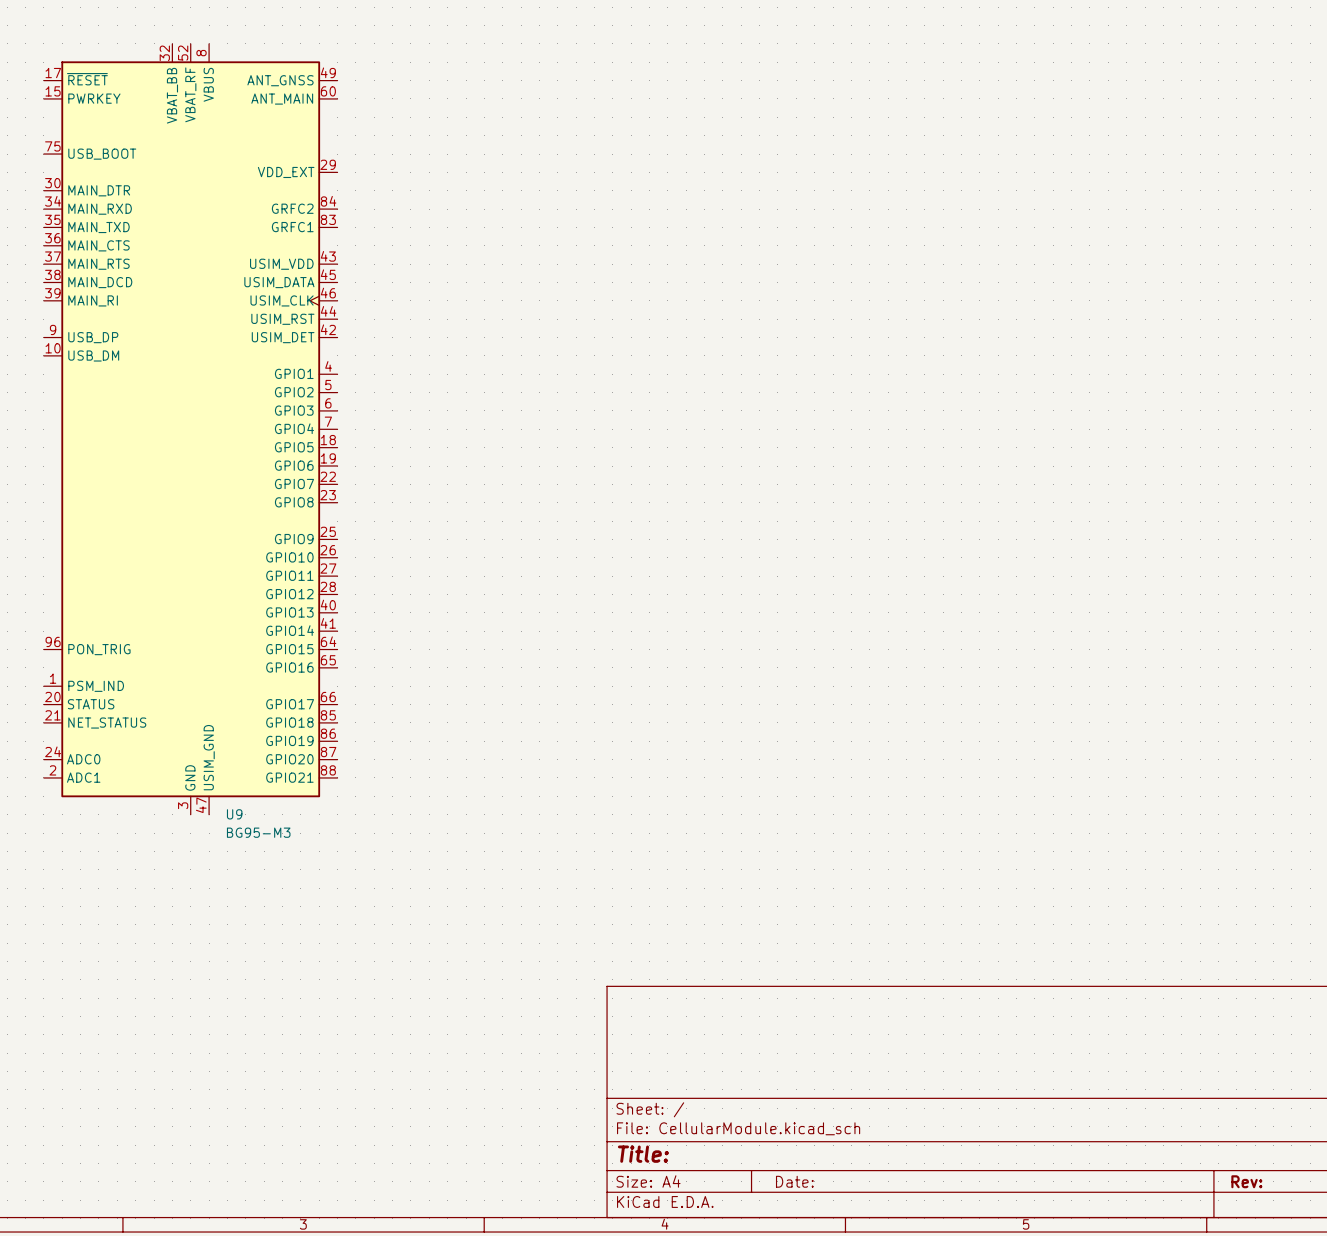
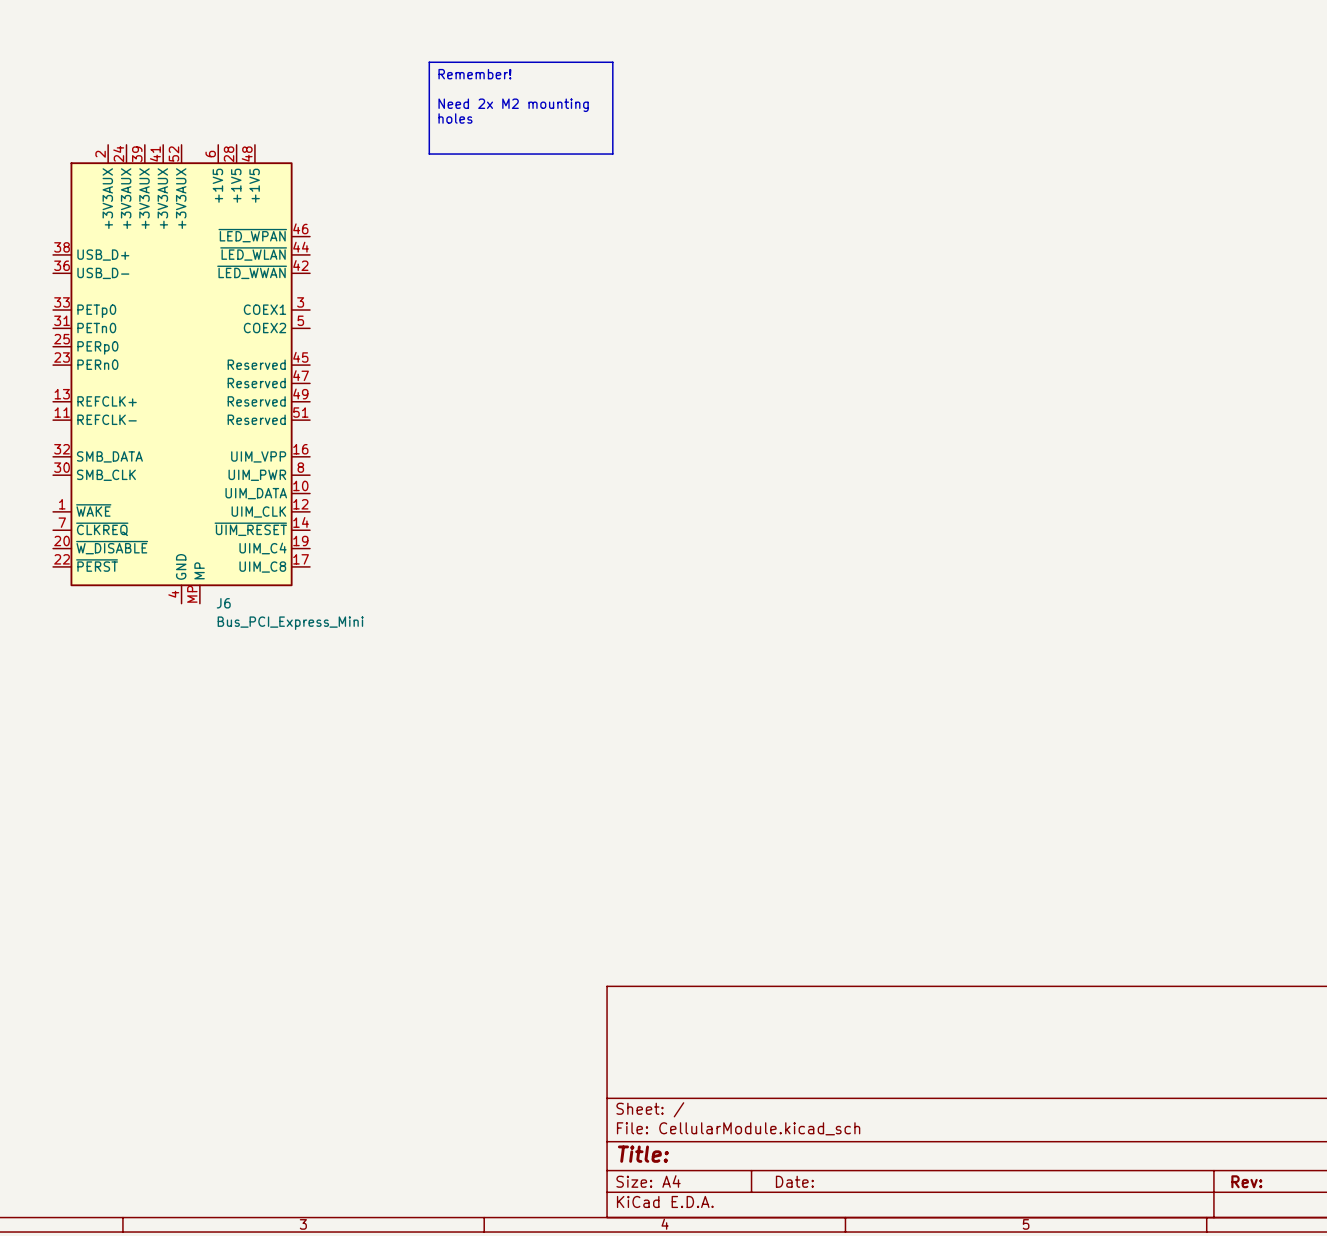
line: none -> (429, 62) (612, 62) (612, 154) (429, 154) (429, 62)
text: none -> Remember! (474, 74)
text: none -> Need 2x M2 mounting (513, 105)
text: none -> holes (455, 118)
J6: none -> Bus_PCI_Express_Mini (181, 374)
U9: BG95-M3 (190, 429) -> none

